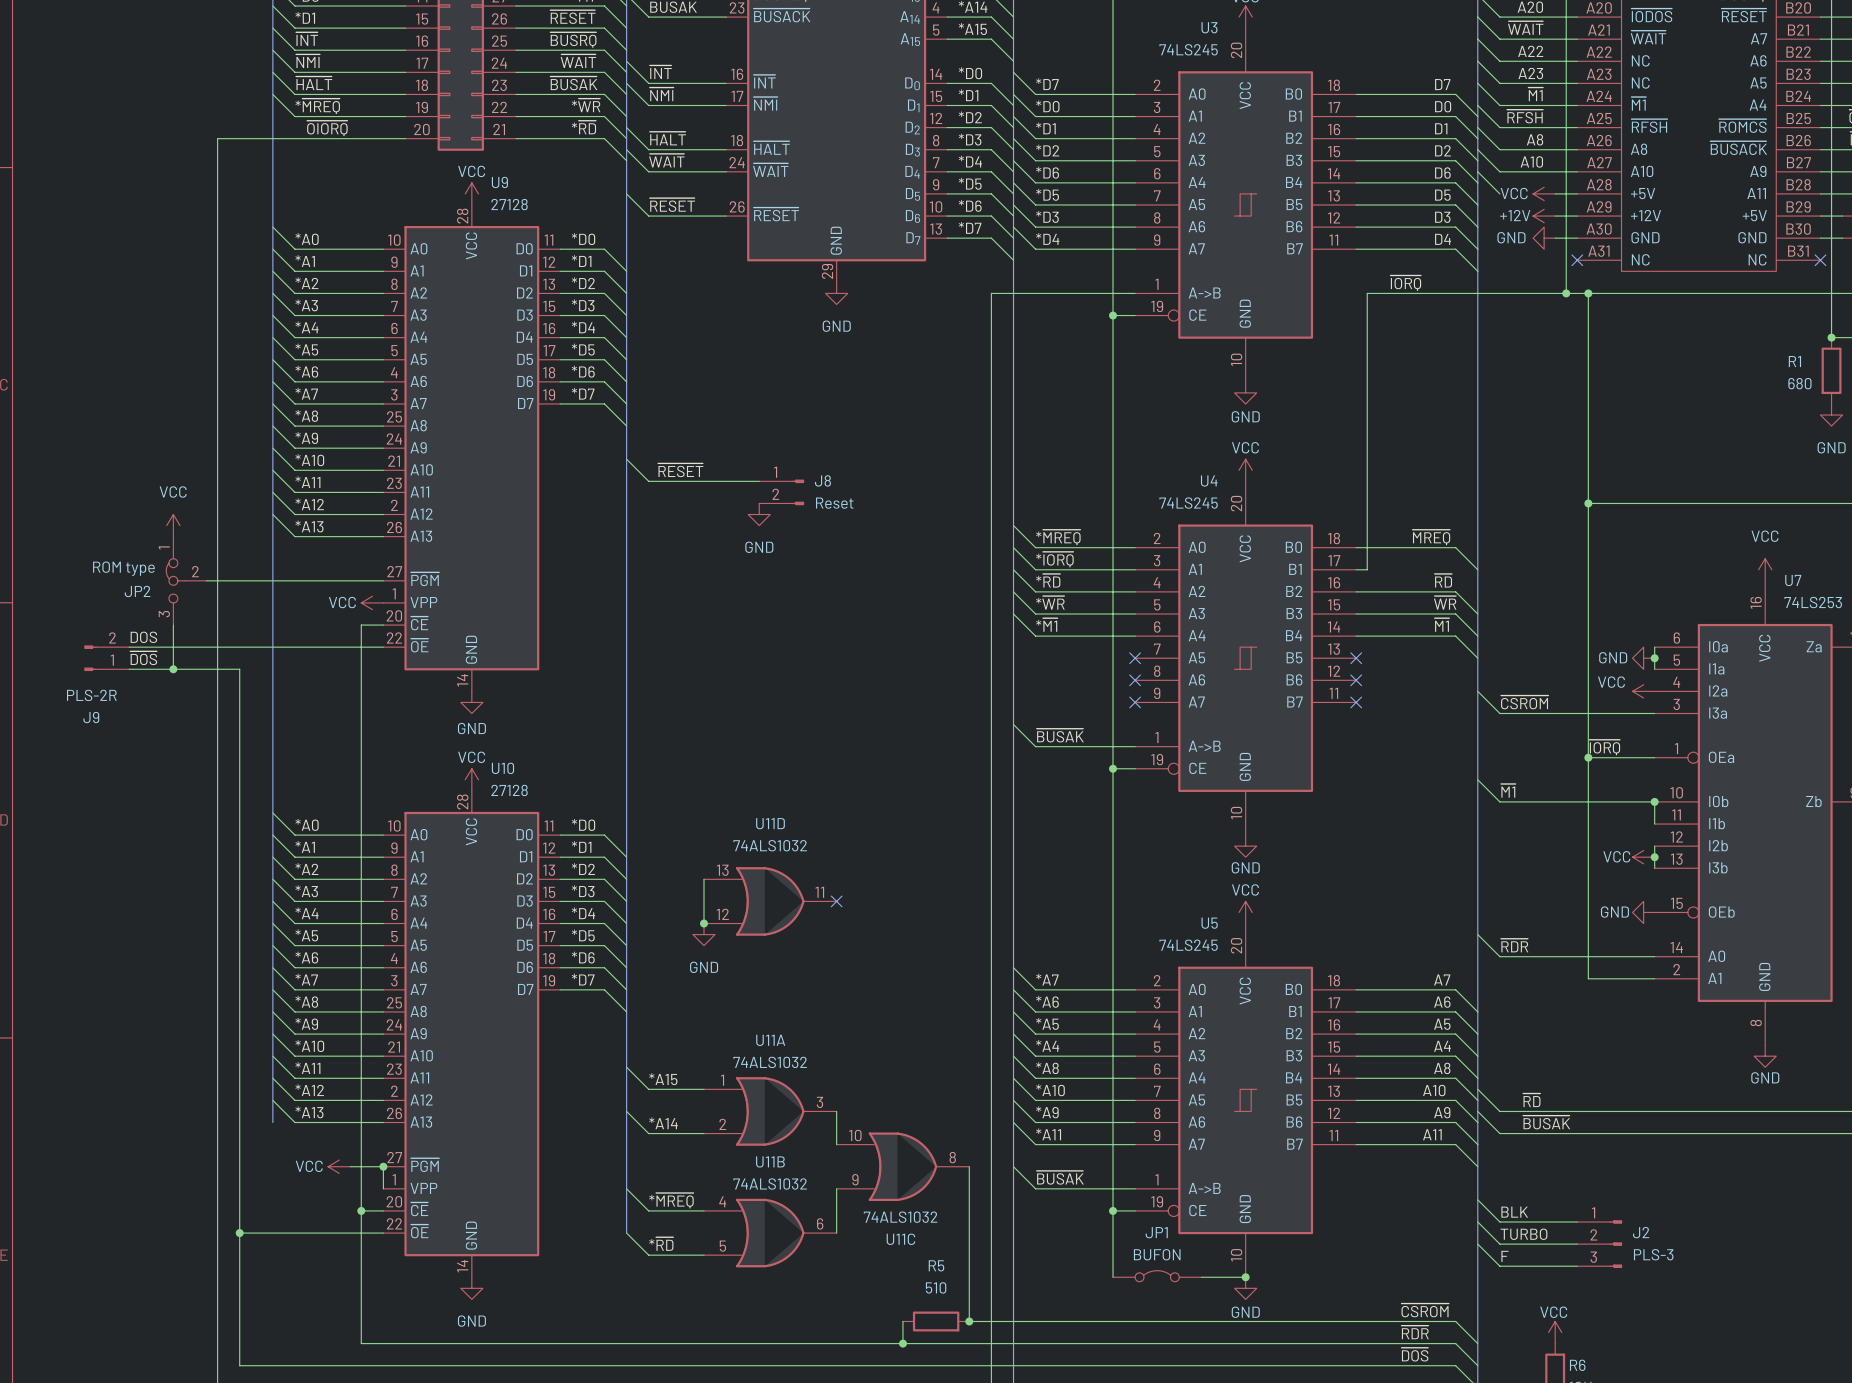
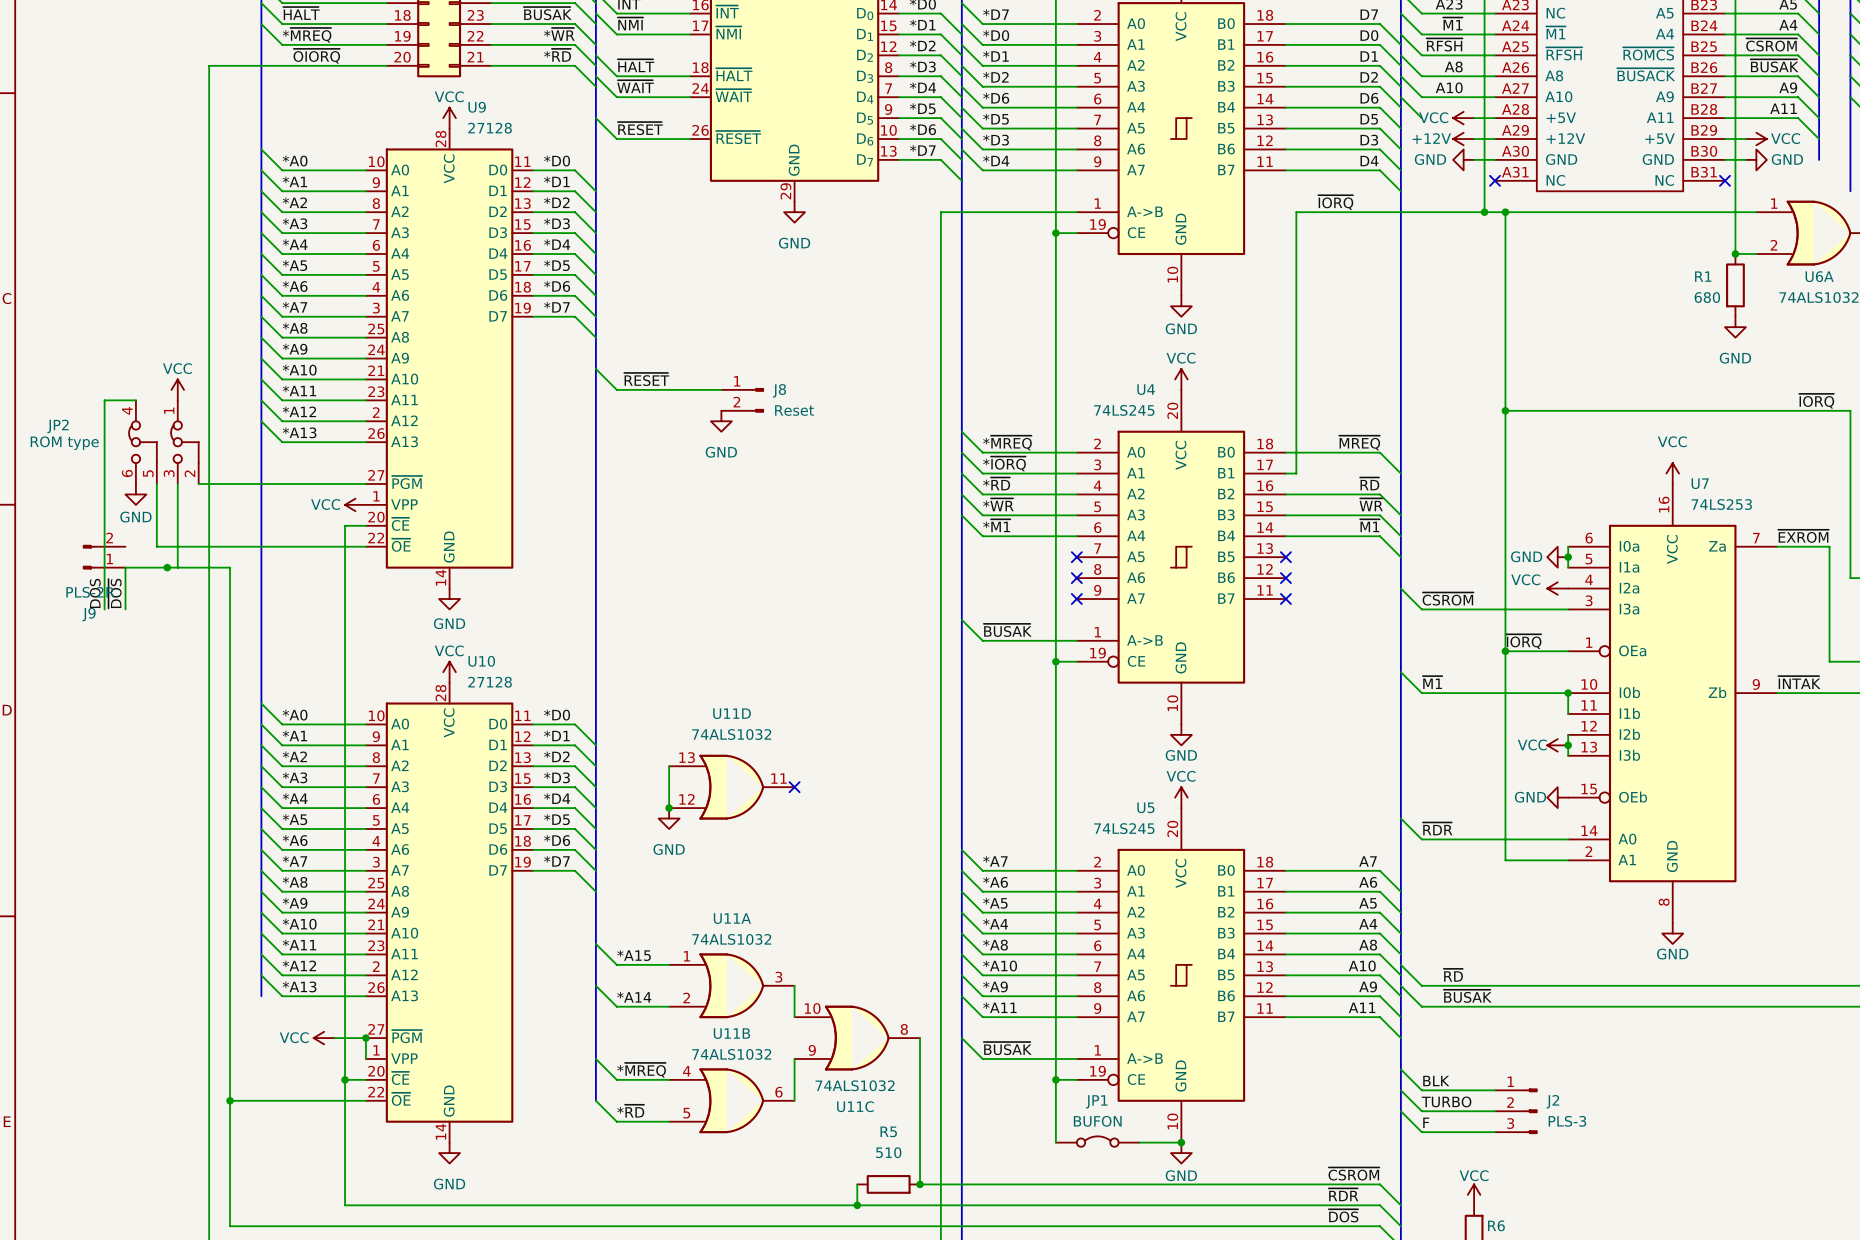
wire: none -> (135, 400) (104, 400) (104, 609)
power symbol text position: VCC (173, 492) -> VCC (177, 368)
power symbol position: VCC (173, 525) -> VCC (177, 389)
JP2 symbol: [166, 536, 207, 626] -> [129, 400, 199, 485]
JP2 value position: ROM type (123, 568) -> ROM type (64, 443)
wire: none -> (177, 484) (177, 567)
JP2 name position: JP2 (137, 591) -> JP2 (58, 426)
power symbol: none -> GND (135, 494)
wire: (173, 625) (173, 669) -> (125, 567) (125, 609)
label rotation: 0° (143, 637) -> 90° counterclockwise (95, 593)
label position: DOS (143, 637) -> DOS (95, 593)
wire: (129, 647) (162, 647) -> (156, 484) (156, 546)
label rotation: 0° (143, 658) -> 90° counterclockwise (115, 593)

